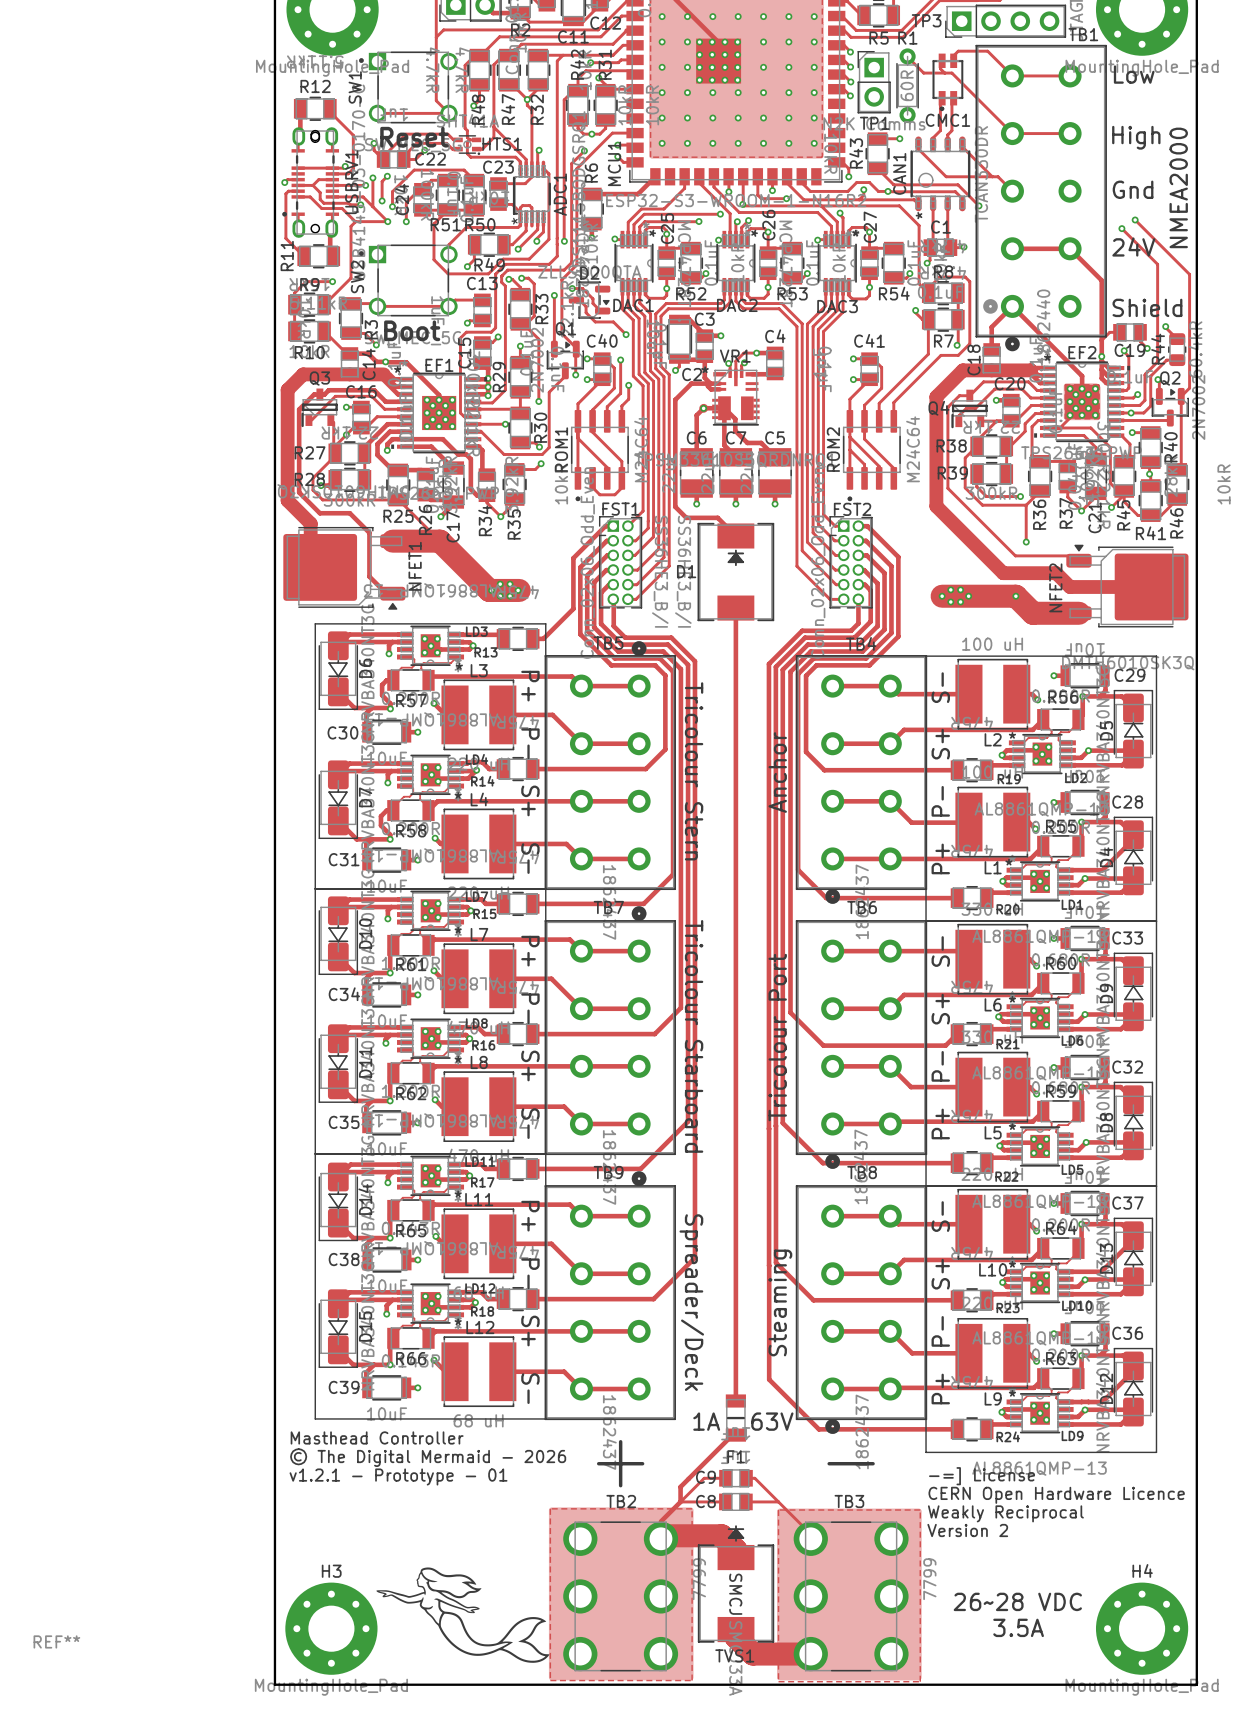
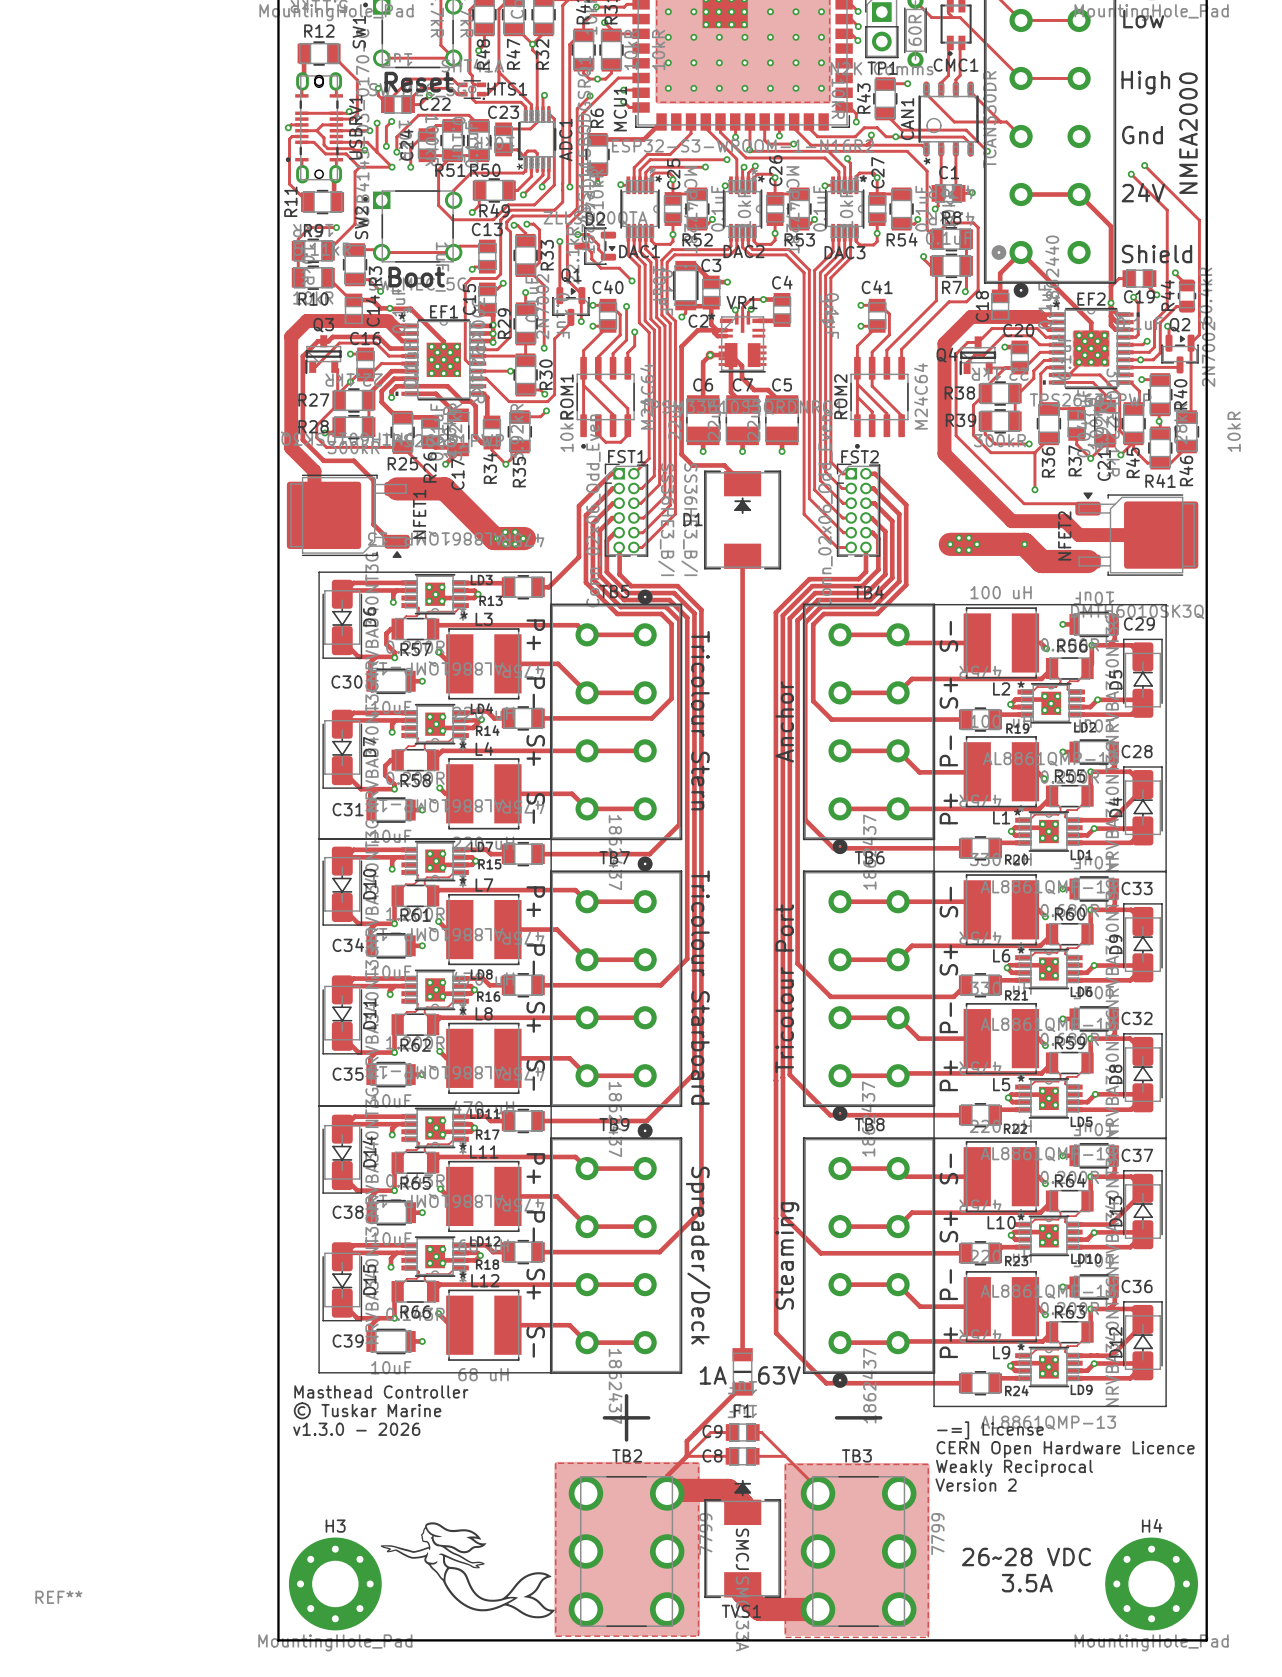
text: © The Digital Mermaid - 2026 (428, 1457) -> © Tuskar Marine (367, 1410)
text: v1.2.1 - Prototype - 01 (398, 1476) -> v1.3.0 - 2026 (356, 1429)

